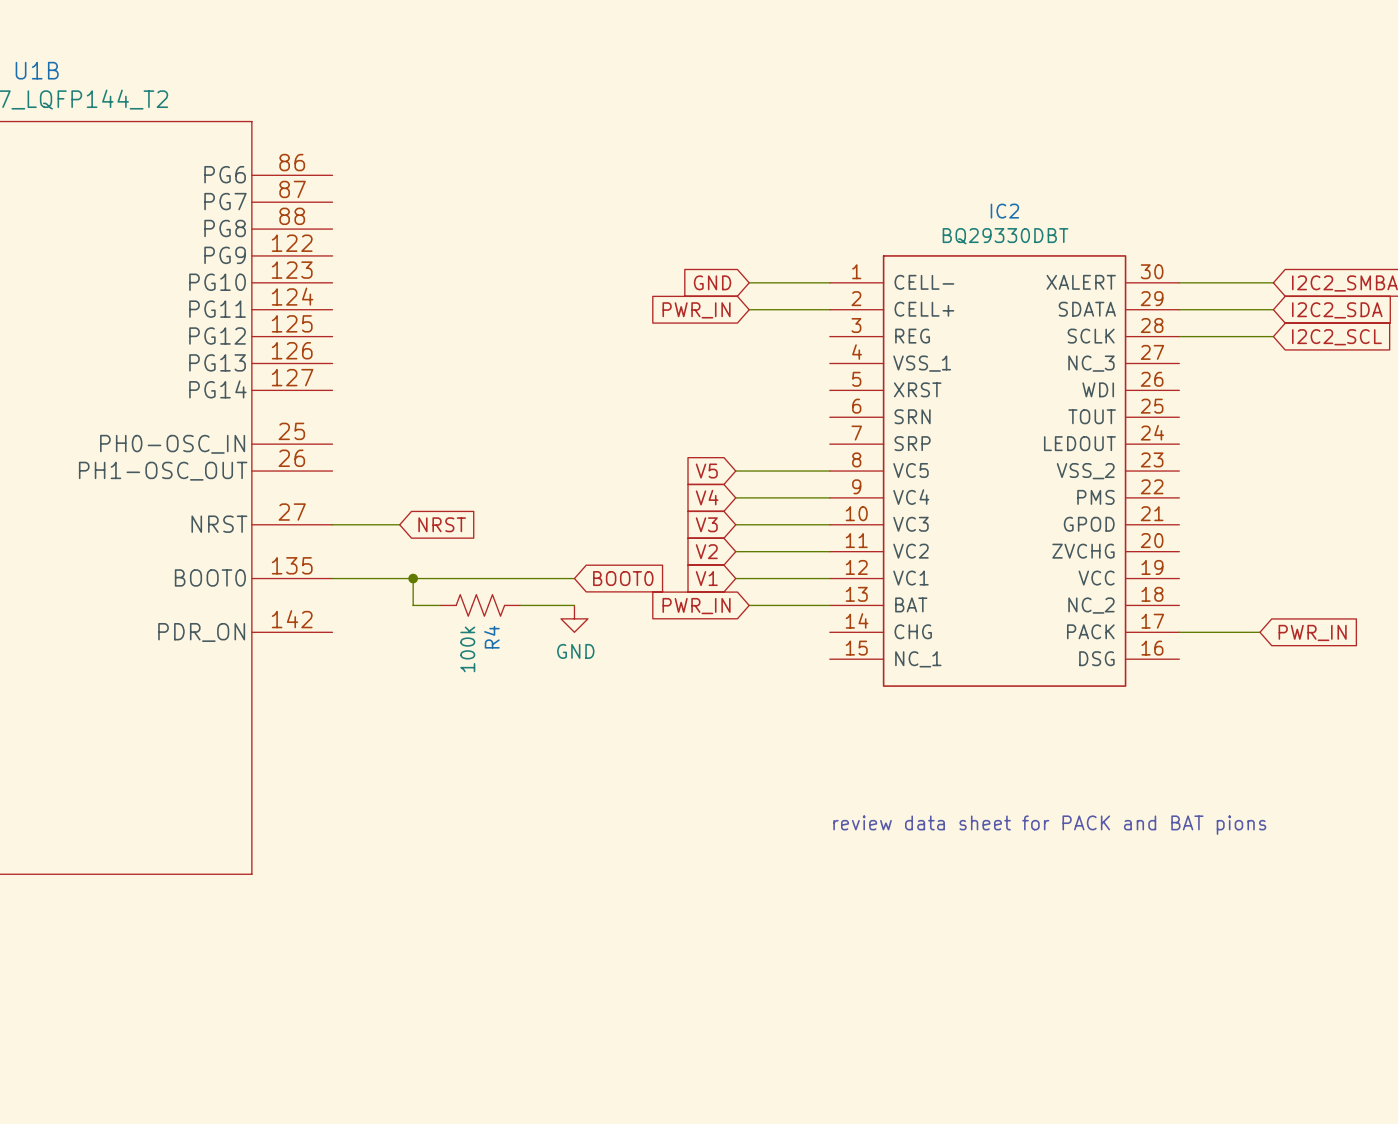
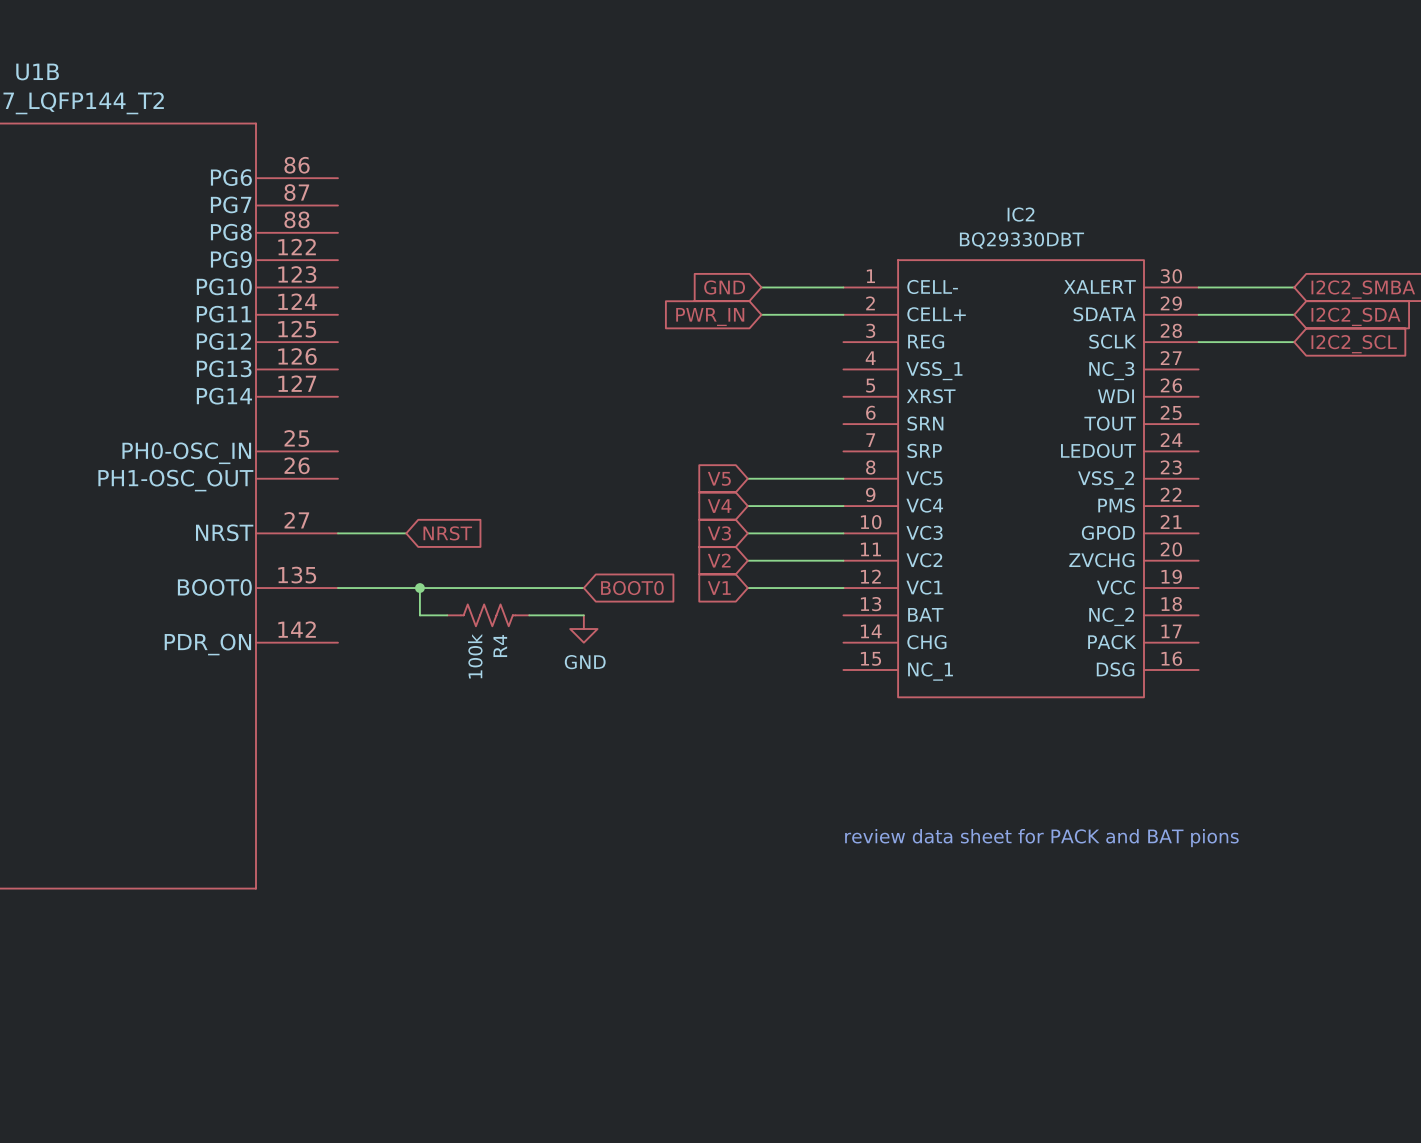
wire: (749, 605) (829, 605) -> none
global label: PWR_IN (696, 606) -> none
wire: (1179, 632) (1259, 632) -> none
global label: PWR_IN (1312, 632) -> none

